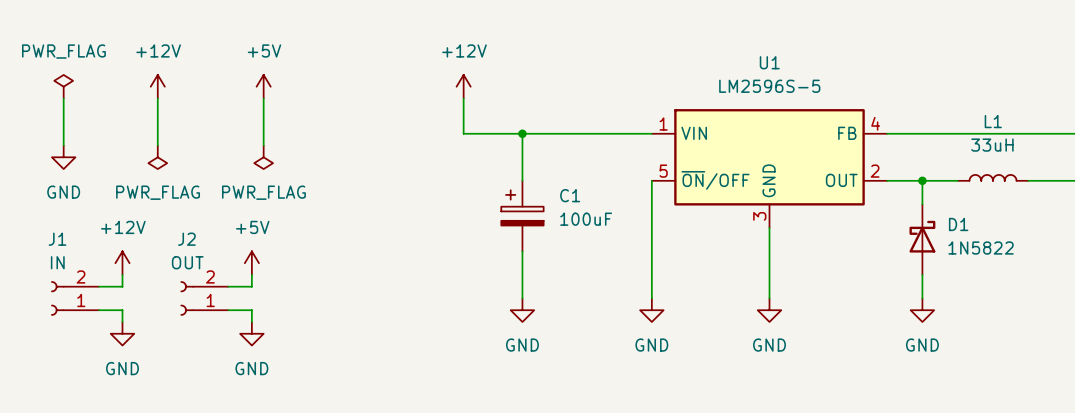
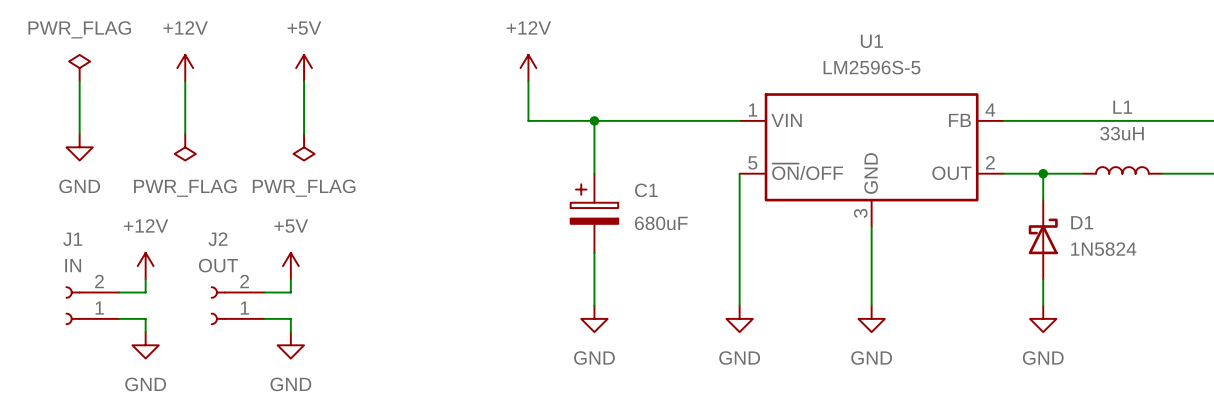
C1 value: 100uF (586, 219) -> 680uF (661, 223)
D1 value: 1N5822 (981, 248) -> 1N5824 (1103, 249)

